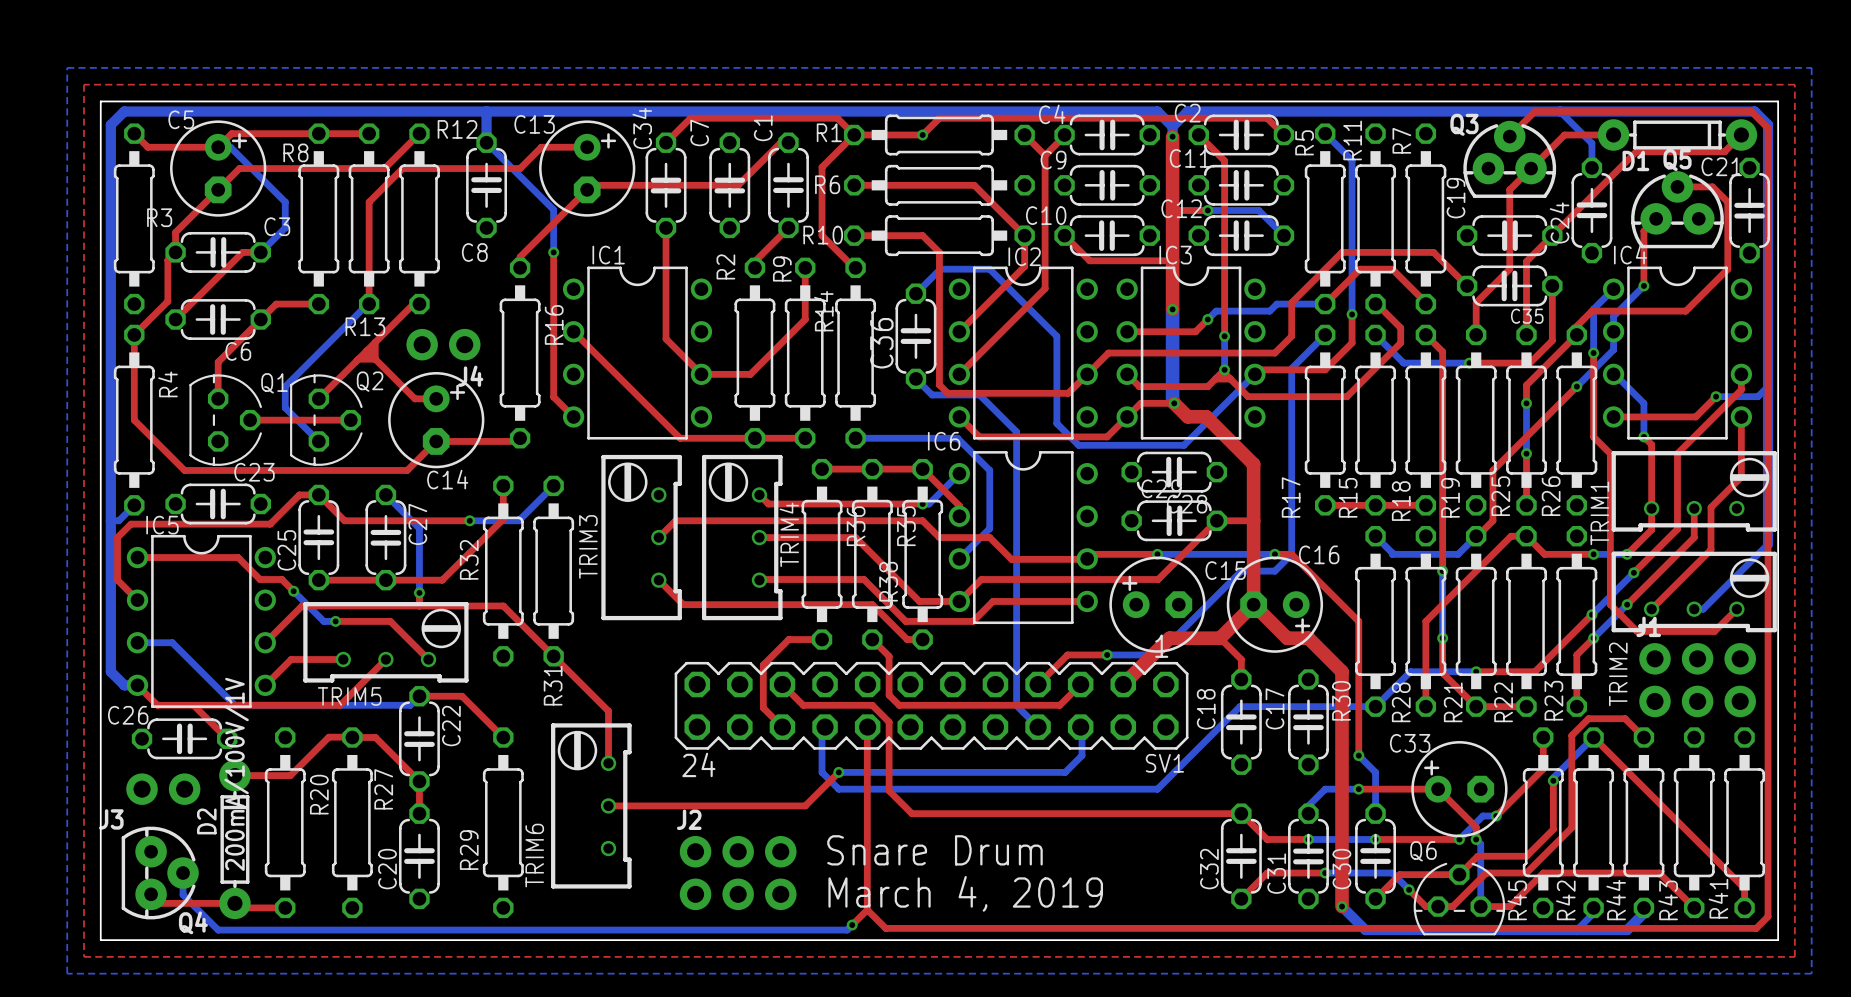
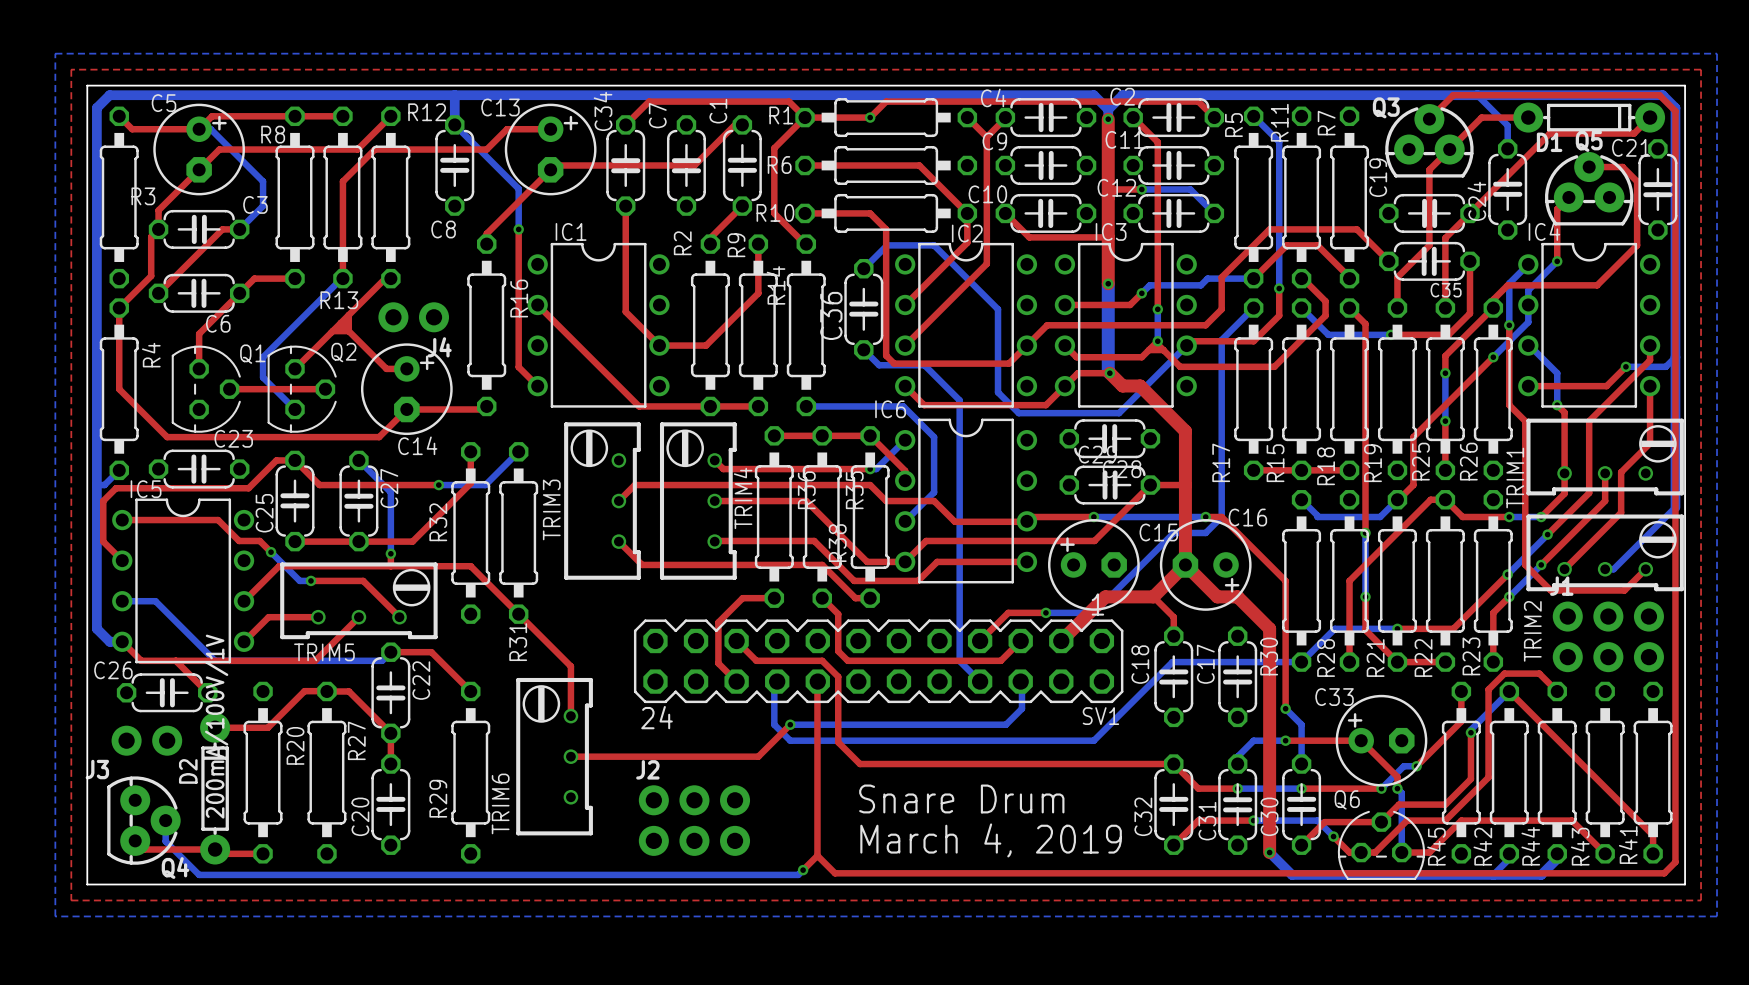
text position: Snare Drum (934, 850) -> Snare Drum (961, 798)
text position: March 4, 2019 (965, 893) -> March 4, 2019 (991, 840)

